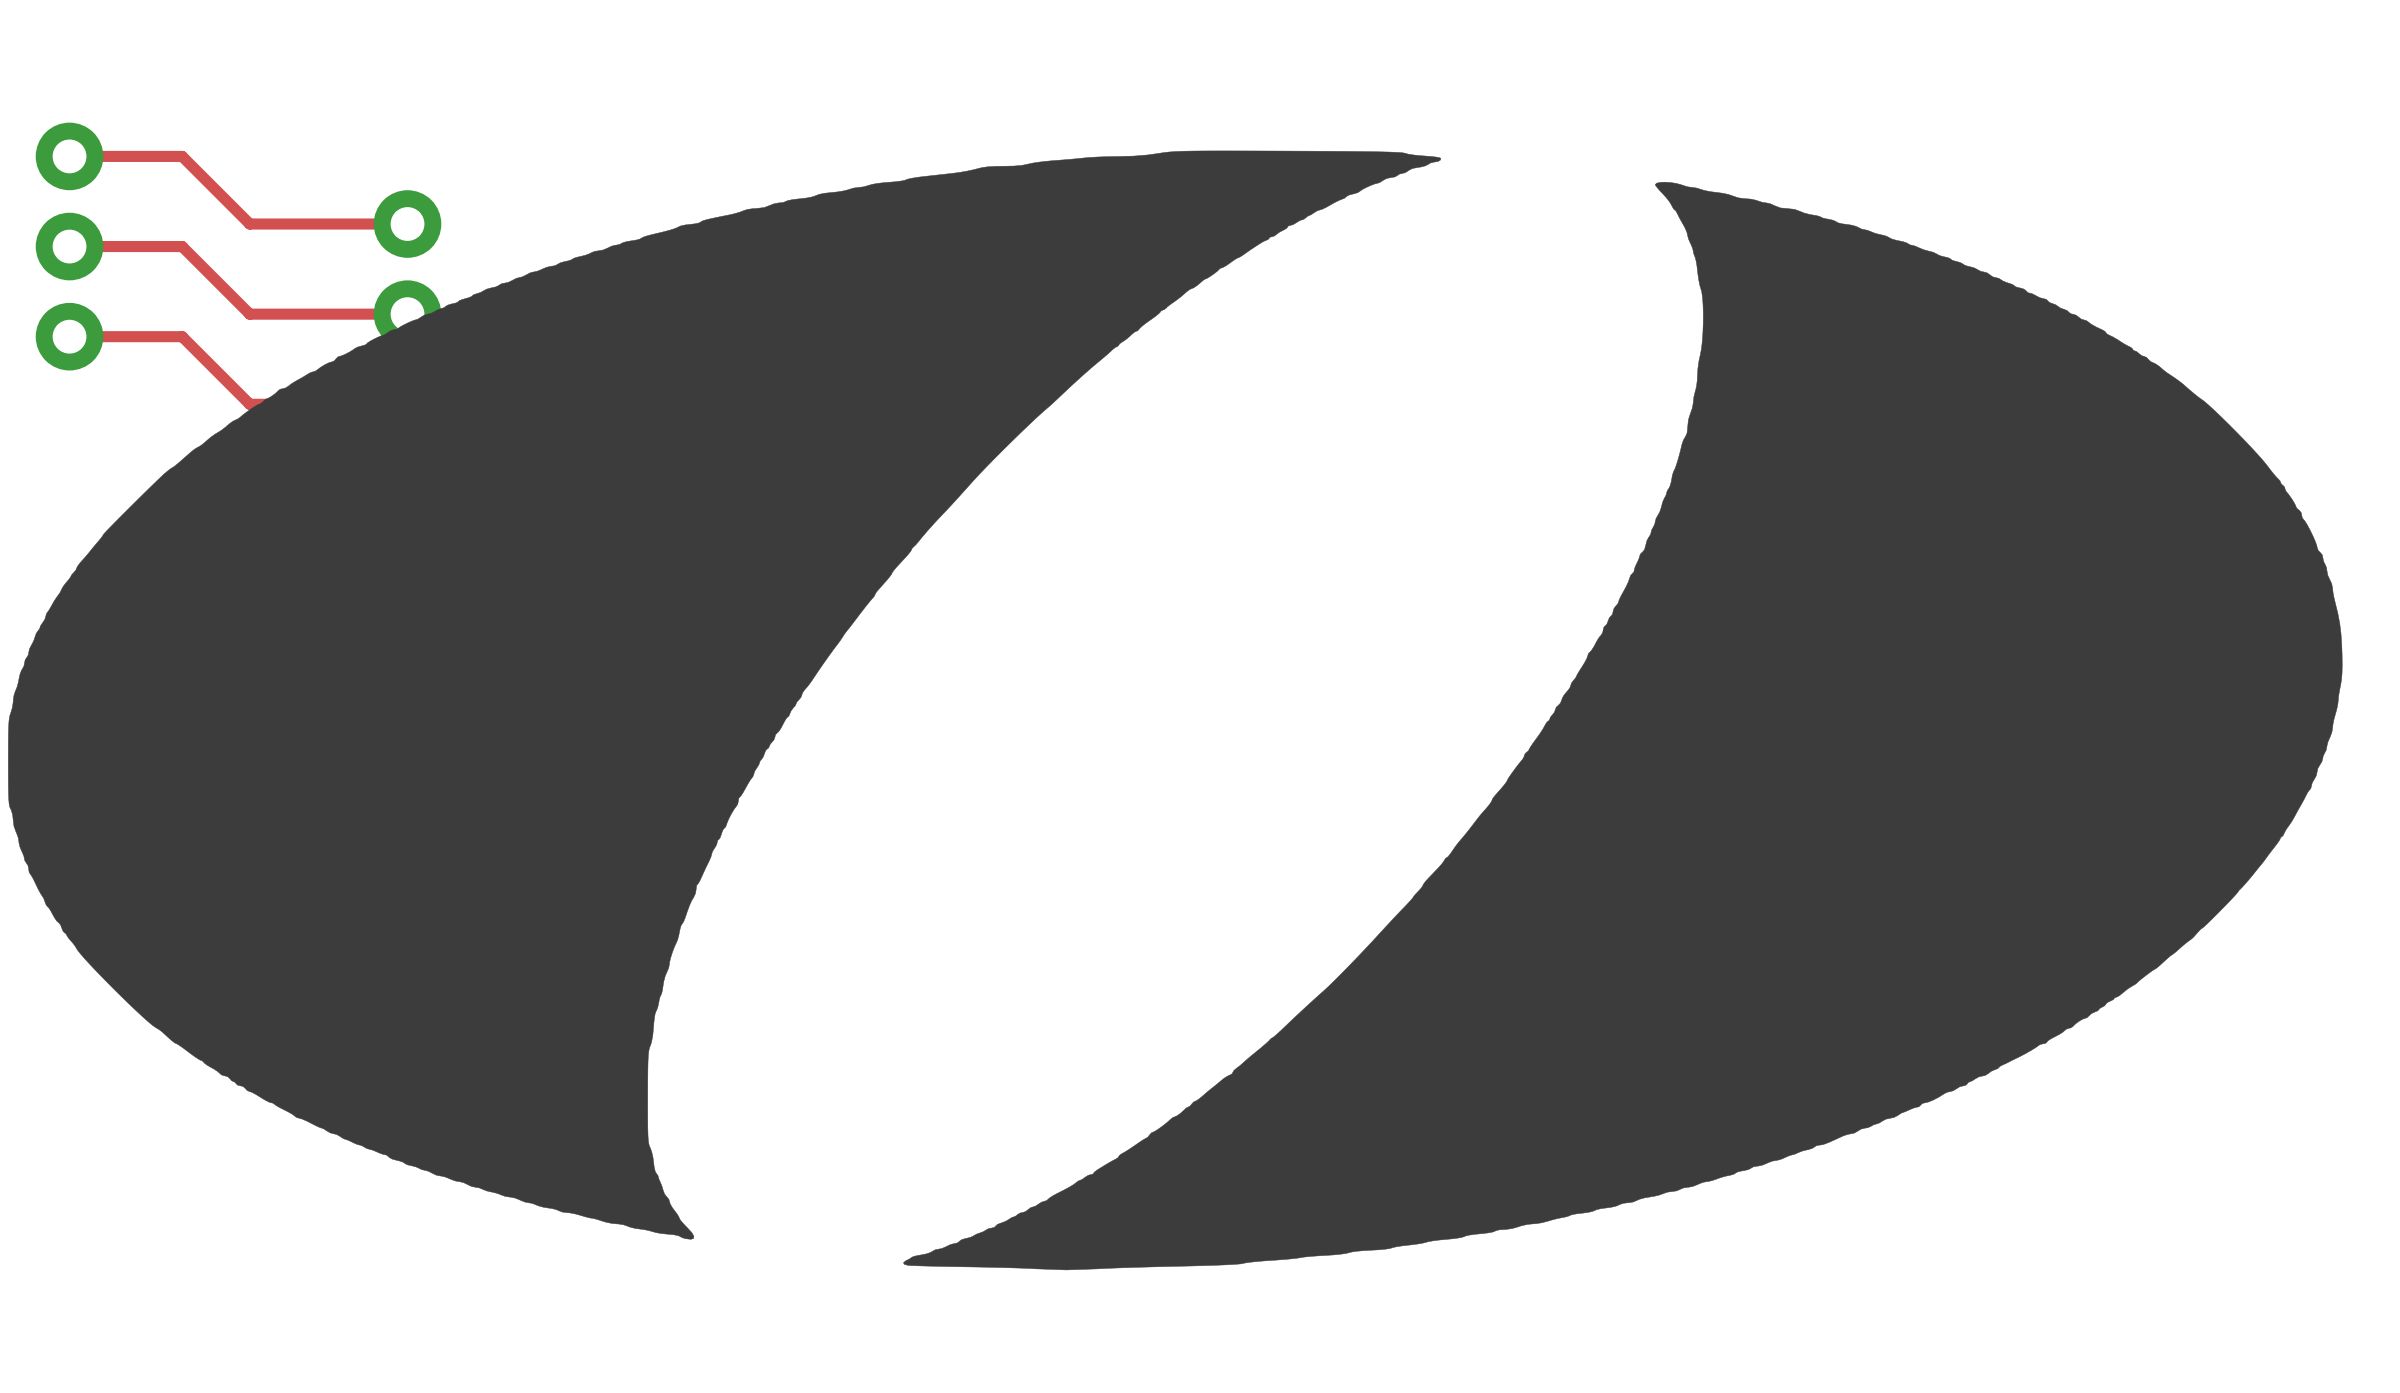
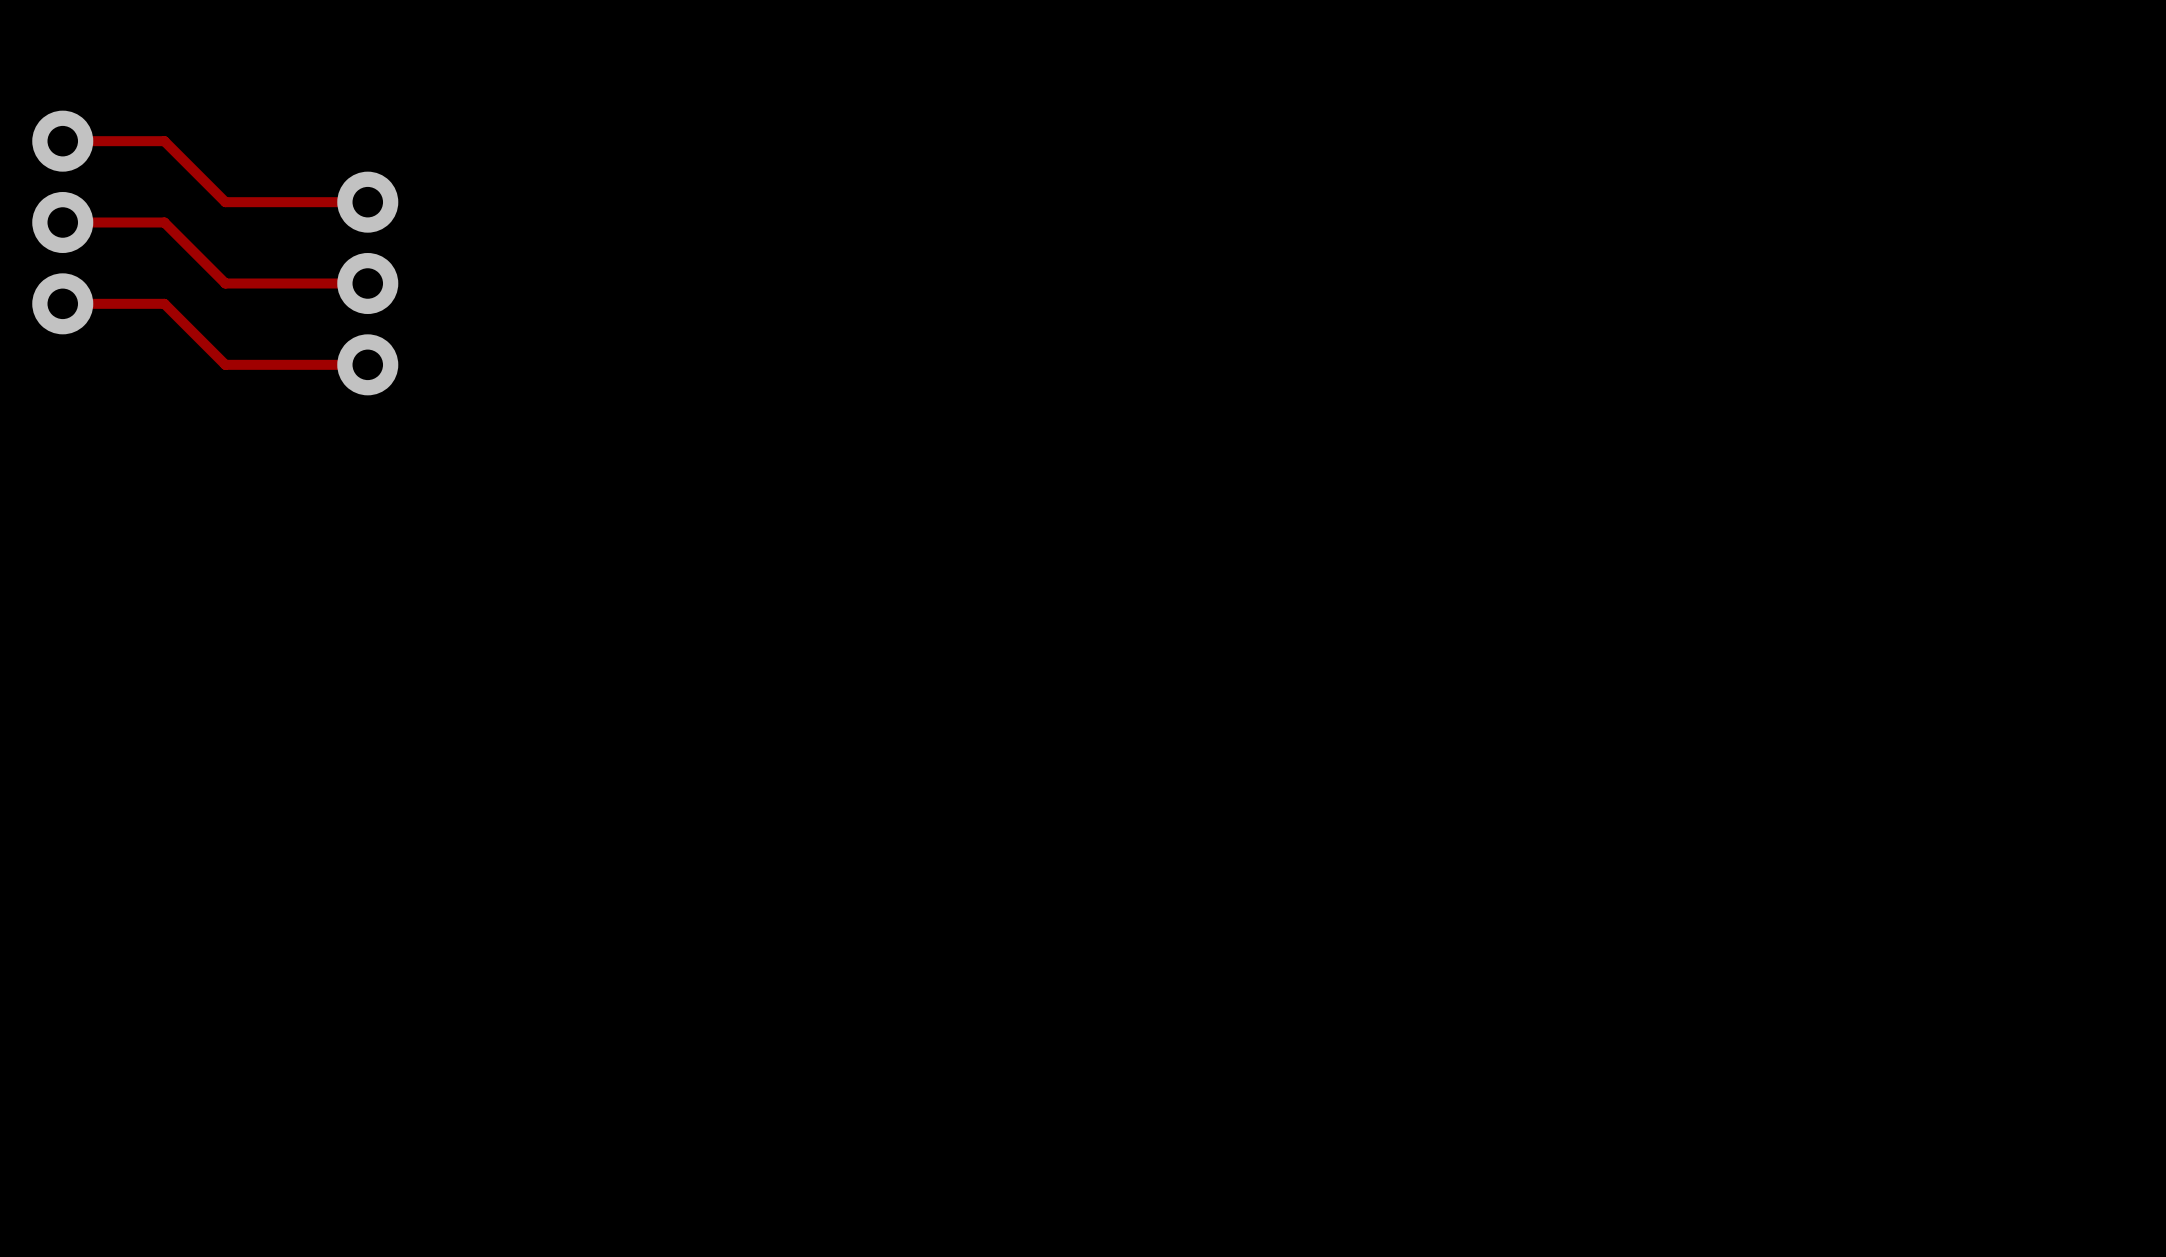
drawing: [8, 150, 2343, 1271] -> none

